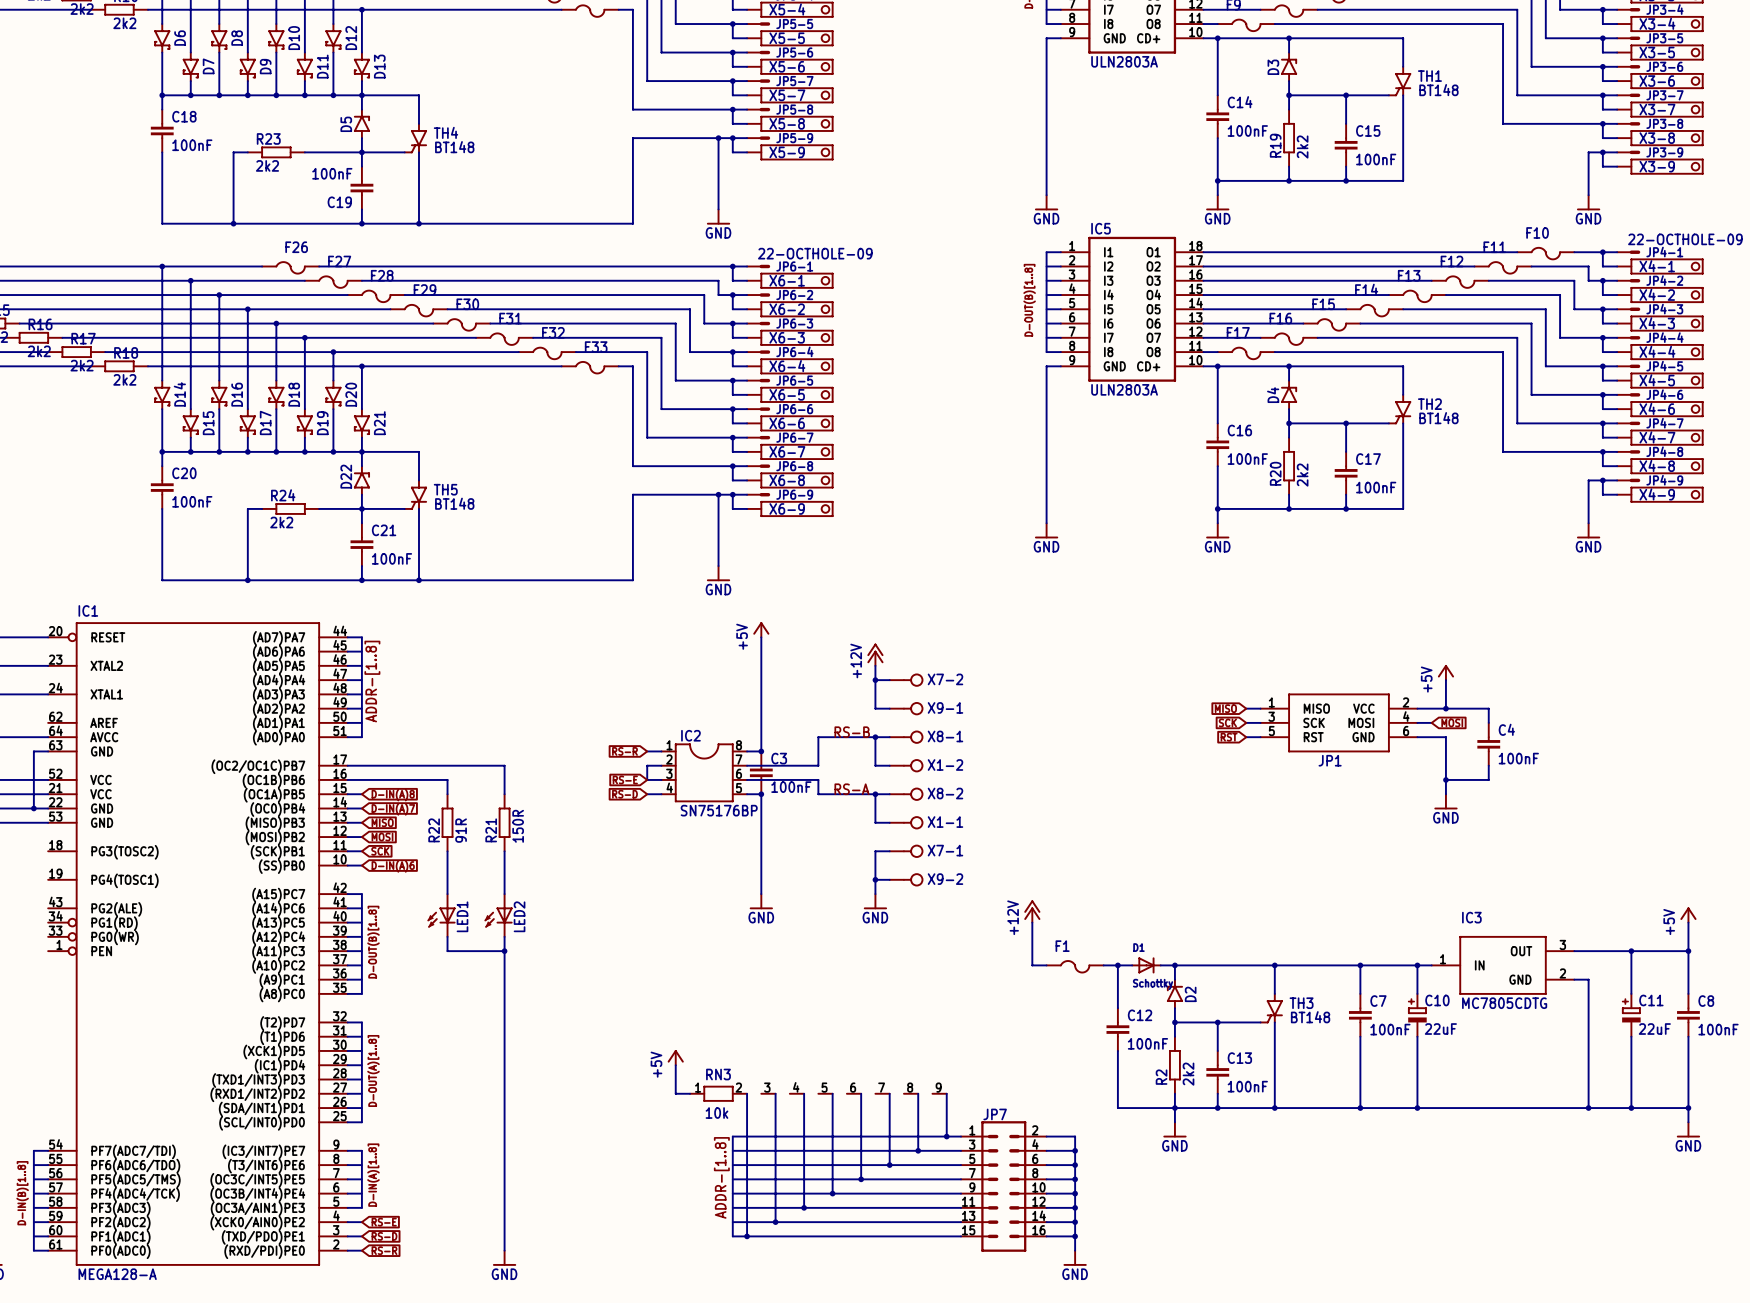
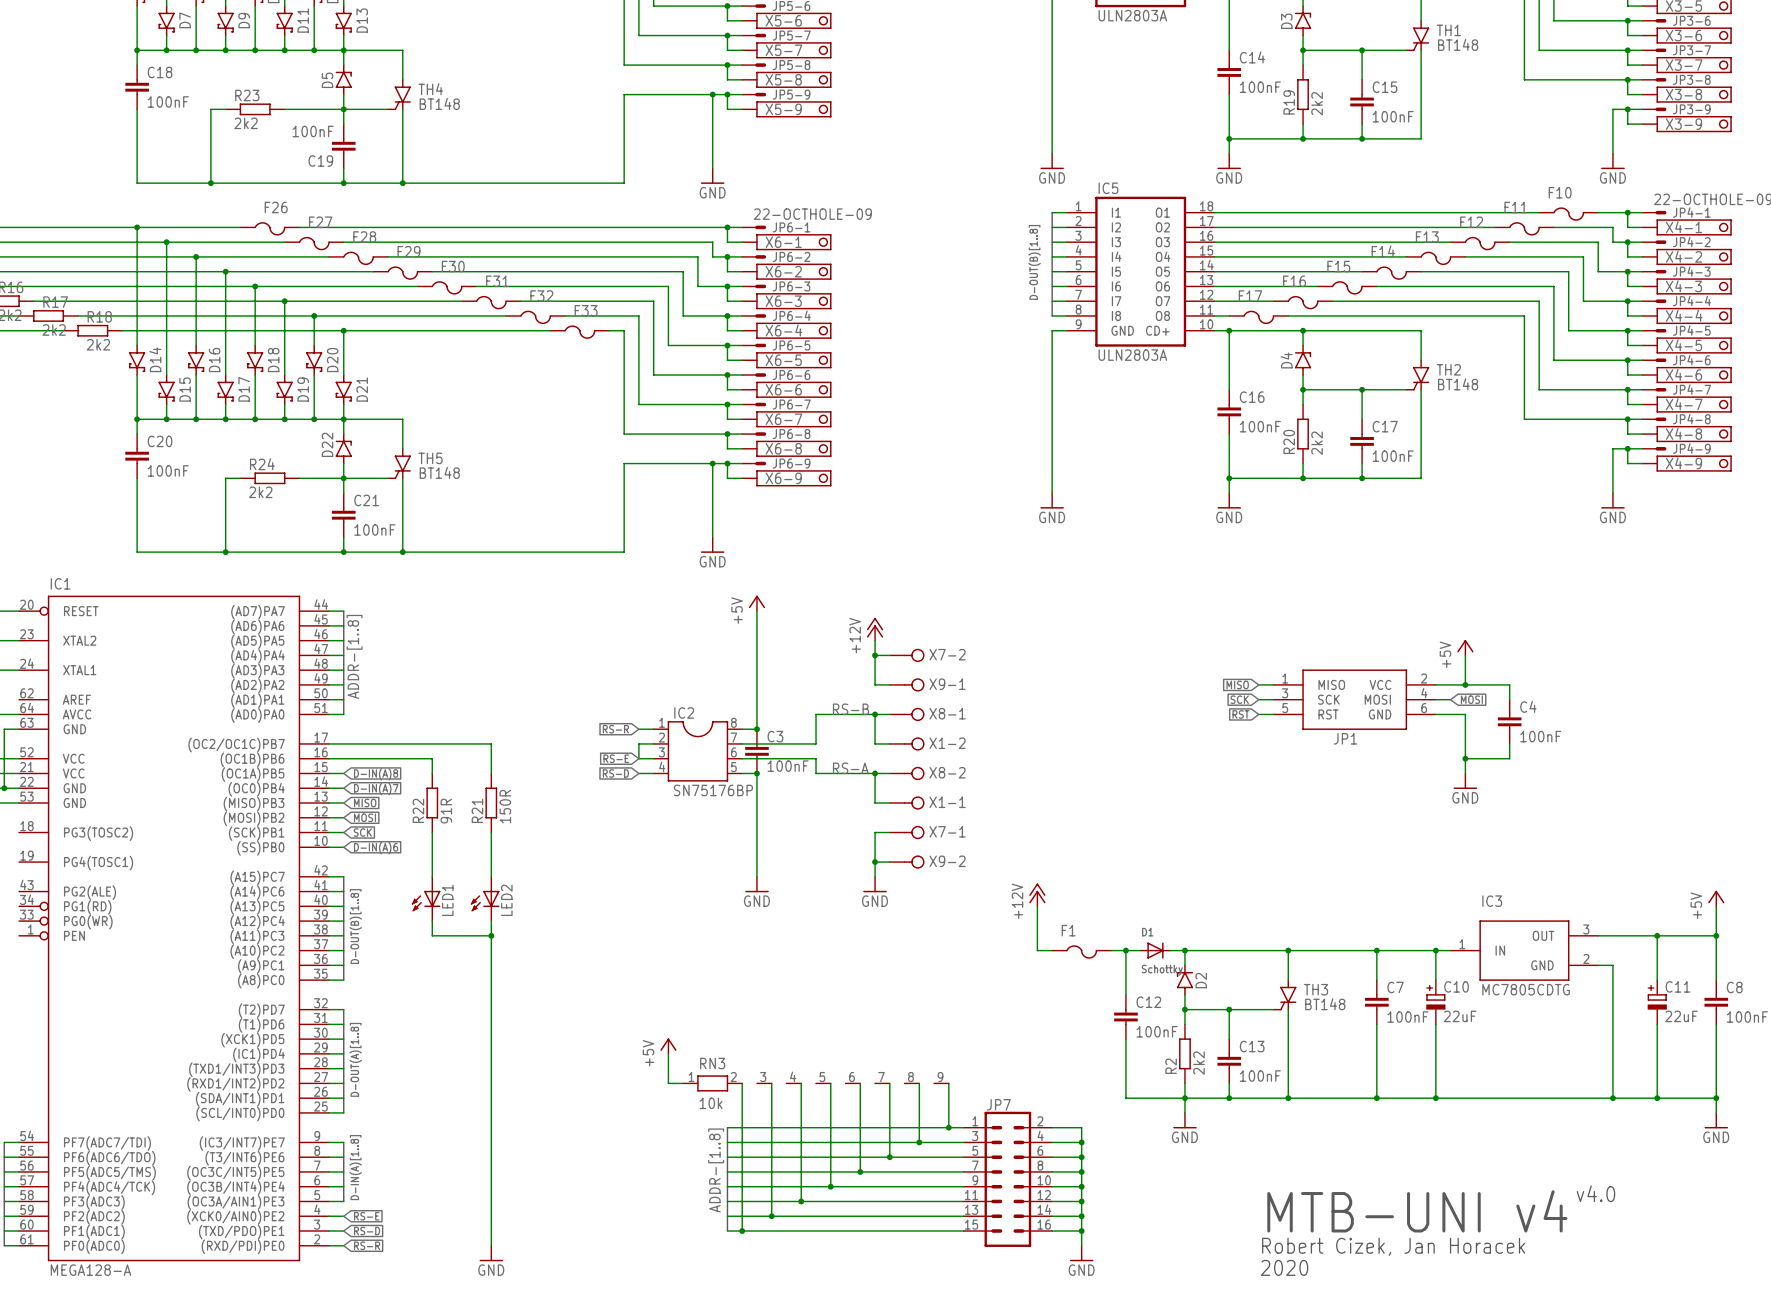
text: none -> v4.0 (1595, 1193)
text: none -> MTB-UNI v4 (1417, 1211)
text: none -> Robert Cizek, Jan Horacek (1393, 1246)
text: none -> 2020 (1284, 1267)

